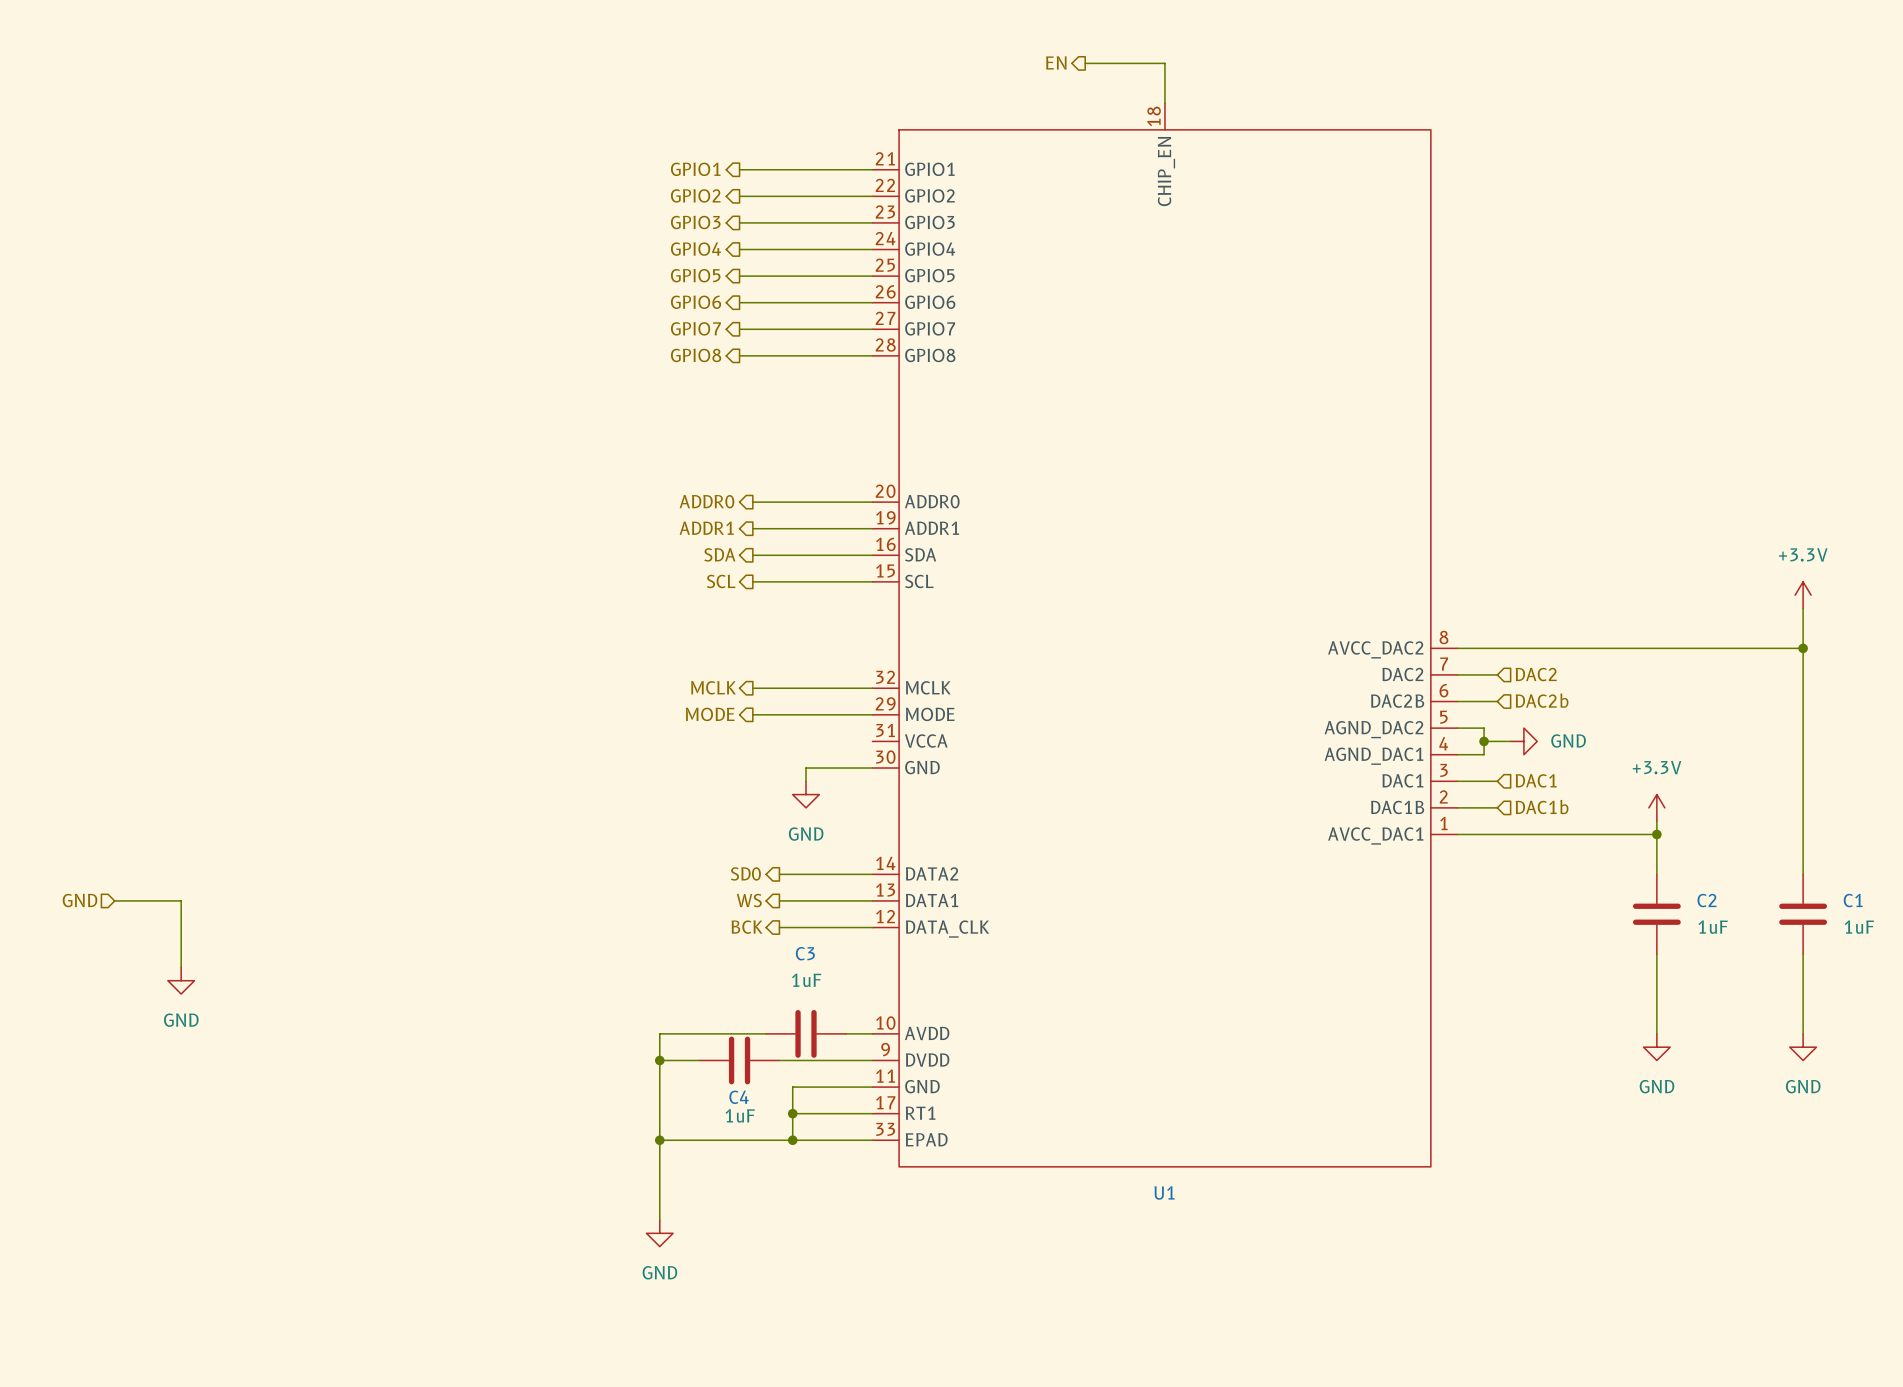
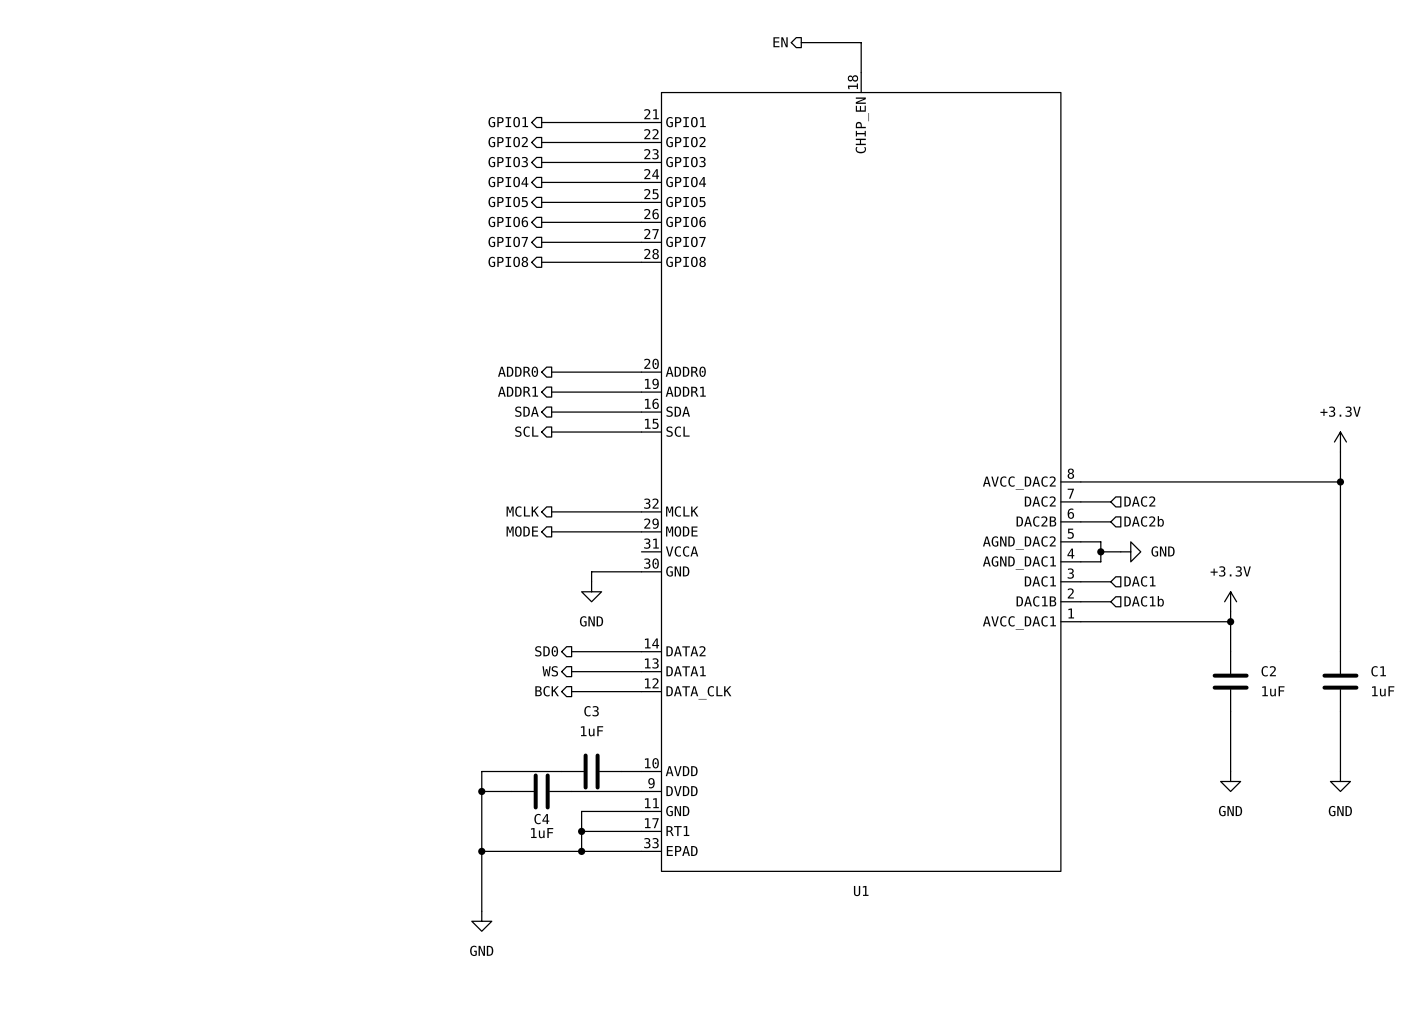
hierarchical label: GND (80, 900) -> none
wire: (114, 900) (181, 900) (181, 967) -> none
power symbol: GND (181, 980) -> none

